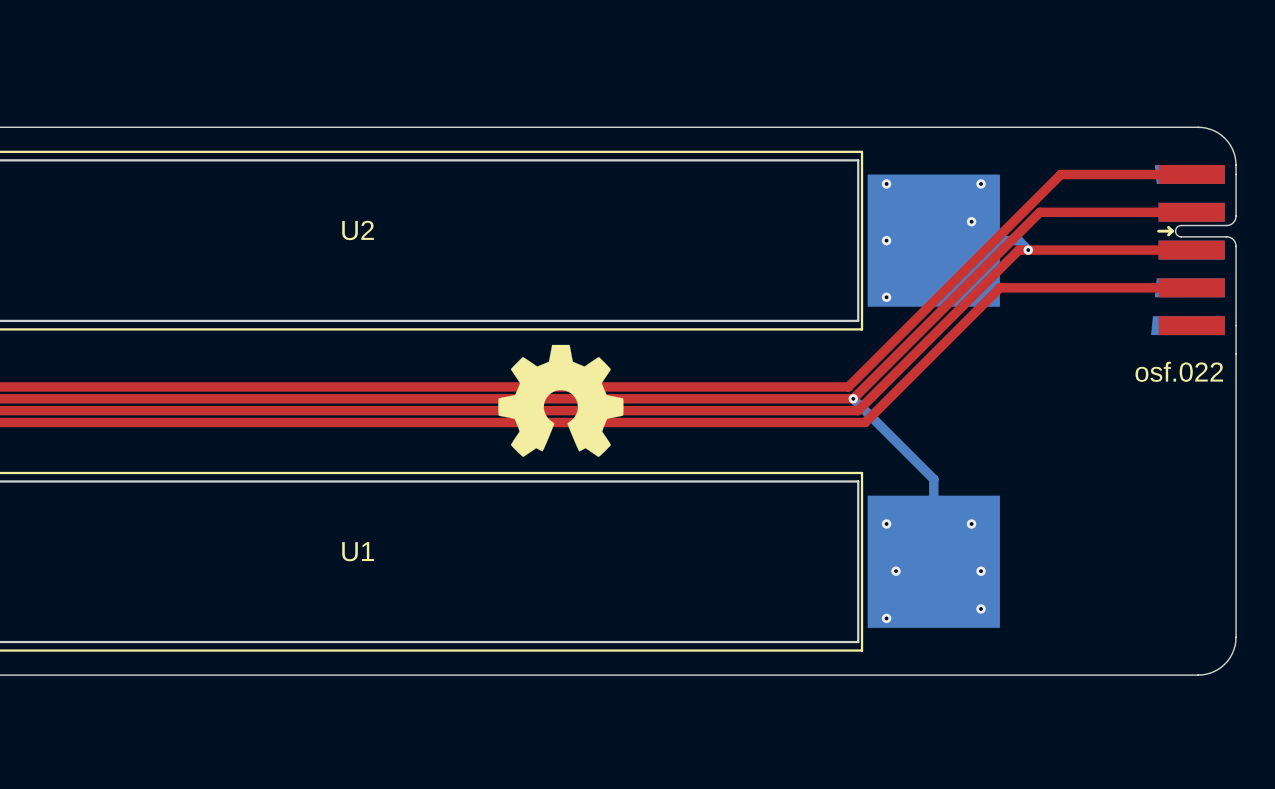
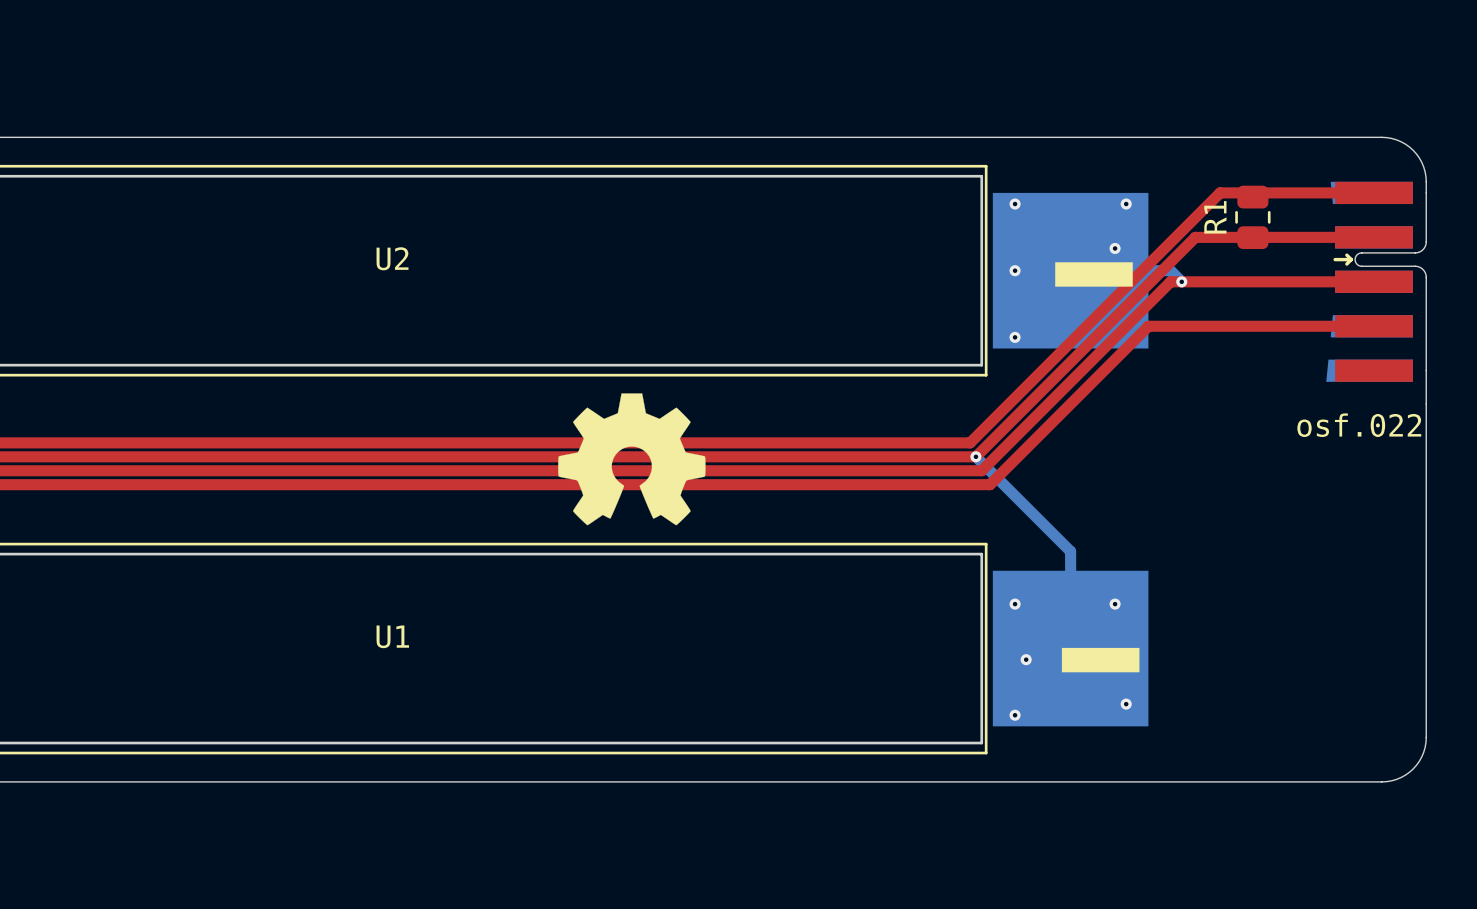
R1: none -> (1252, 217)
text: none -> - (1093, 274)
text: none -> - (1100, 660)

